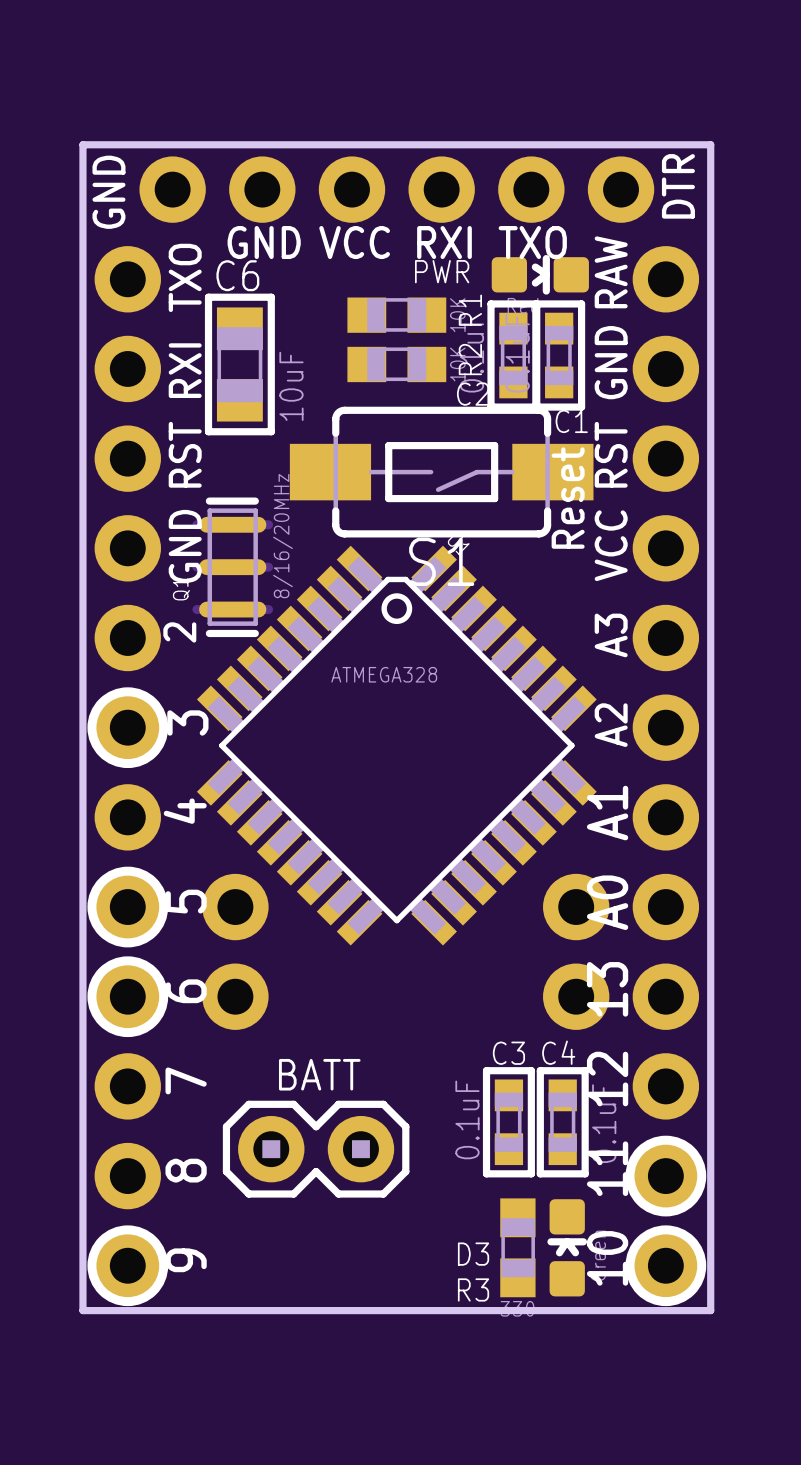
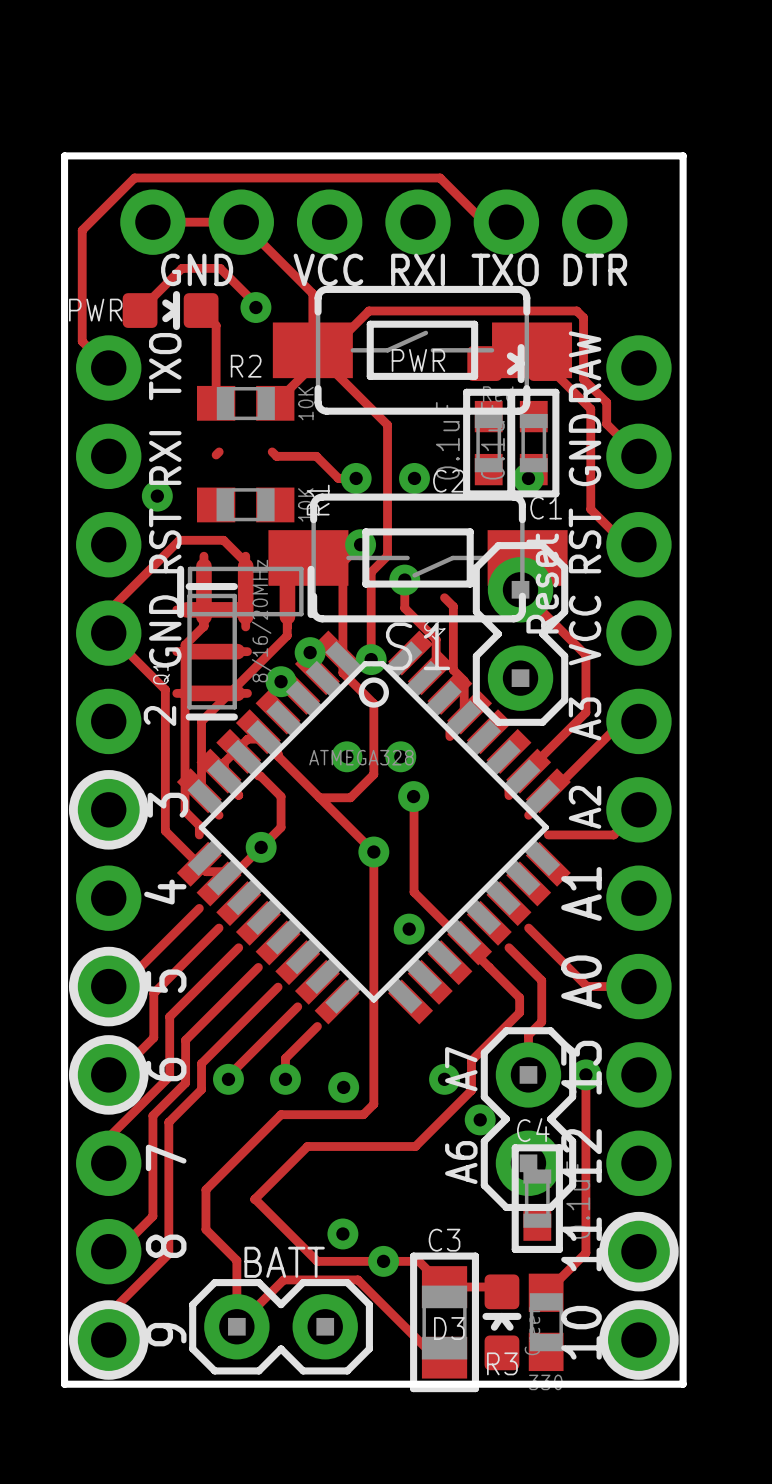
track: none -> (152, 222) (241, 222) (312, 293) (312, 350) (387, 424) (387, 555) (371, 572) (371, 659)
track: none -> (506, 222) (484, 222) (440, 177) (134, 177) (82, 230) (82, 341) (108, 367)
board edge: (82, 144) (710, 144) -> (64, 235) (64, 155) (683, 155) (683, 235)
text: none -> GND (197, 269)
text rotation: 0° (678, 186) -> 90° clockwise (595, 269)
part position: (396, 189) -> (373, 222)
text: GND (108, 192) -> none
track: none -> (255, 307) (255, 304) (220, 268) (182, 268) (140, 310)
via: none -> (255, 307)
PWR: none -> (170, 310)
track: none -> (201, 310) (216, 325) (216, 403)
text: GND (264, 242) -> none
text position: VCC (354, 242) -> VCC (328, 269)
text position: RXI (444, 242) -> RXI (418, 269)
text position: TXO (532, 242) -> TXO (505, 269)
part: none -> (422, 350)
track: none -> (532, 350) (590, 409) (590, 509) (626, 544) (638, 544)
text position: RAW (611, 272) -> RAW (585, 366)
track: none -> (275, 403) (311, 366) (311, 354) (307, 350) (329, 350) (368, 310) (576, 310) (583, 317) (583, 379) (606, 402) (606, 424) (638, 456)
R1 position: (396, 315) -> (245, 504)
R2 name rotation: 0° (470, 359) -> 90° clockwise (246, 366)
R2 name position: R2 (470, 359) -> R2 (246, 366)
track: none -> (219, 451) (216, 454)
C6: 10uF (239, 364) -> none
track: none -> (272, 451) (276, 456) (316, 456) (338, 478) (356, 478)
R2 position: (396, 364) -> (245, 403)
via: none -> (356, 478)
via: none -> (414, 478)
via: none -> (528, 478)
via: none -> (157, 496)
track: none -> (360, 544) (342, 562) (342, 672) (373, 703) (373, 774) (350, 797) (319, 797)
via: none -> (360, 544)
track: none -> (404, 580) (404, 608) (436, 639) (436, 661)
via: none -> (404, 580)
track: none -> (520, 589) (585, 655) (585, 712) (508, 789) (508, 795)
track: none -> (203, 591) (203, 626) (185, 645) (185, 811) (199, 825) (199, 834)
track: none -> (245, 591) (245, 562) (223, 540) (179, 540) (108, 610) (108, 633) (165, 689) (165, 830) (206, 871) (236, 871) (281, 827) (281, 796) (258, 775)
part: none -> (245, 591)
track: none -> (287, 591) (287, 635) (201, 721) (201, 797) (219, 815)
track: none -> (444, 597) (453, 606) (453, 670) (464, 680) (464, 712) (449, 727) (449, 736)
via: none -> (310, 652)
via: none -> (371, 659)
via: none -> (281, 681)
track: none -> (638, 721) (622, 721) (528, 815)
via: none -> (346, 756)
via: none -> (400, 756)
track: none -> (238, 795) (224, 780) (224, 762) (247, 739) (263, 739) (373, 851) (373, 1104) (363, 1114) (281, 1114) (205, 1189) (205, 1229) (236, 1260) (236, 1326) (283, 1279) (357, 1279) (435, 1357) (444, 1357)
track: none -> (414, 797) (414, 892) (519, 997) (519, 1012) (471, 1060) (471, 1090) (415, 1146) (307, 1146) (254, 1199)
via: none -> (413, 796)
track: none -> (638, 809) (613, 834) (548, 834)
via: none -> (261, 847)
via: none -> (373, 851)
track: none -> (199, 908) (121, 986) (108, 986)
track: none -> (219, 928) (153, 993) (153, 1037) (116, 1074) (108, 1074)
track: none -> (528, 928) (587, 986) (638, 986)
via: none -> (409, 929)
track: none -> (238, 947) (169, 1016) (169, 1076) (108, 1137) (108, 1163)
track: none -> (508, 947) (541, 980) (541, 1021) (528, 1035) (528, 1074)
track: none -> (258, 967) (185, 1040) (185, 1083) (152, 1115) (152, 1216) (117, 1251) (108, 1251)
track: none -> (278, 987) (201, 1063) (201, 1089) (168, 1122) (168, 1254) (108, 1314) (108, 1340)
track: none -> (297, 1006) (228, 1076) (228, 1079)
track: none -> (317, 1026) (285, 1058) (285, 1079)
part side: bottom (235, 951) -> top (520, 633)
part side: bottom (576, 951) -> top (528, 1119)
text: none -> A7 (461, 1069)
track: none -> (585, 1074) (585, 1253) (546, 1292)
via: none -> (585, 1074)
via: none -> (228, 1079)
via: none -> (285, 1079)
via: none -> (444, 1079)
via: none -> (343, 1087)
via: none -> (480, 1119)
C3 footprint: [482, 1067, 535, 1178] -> [410, 1252, 479, 1393]
BATT name position: BATT (319, 1074) -> BATT (284, 1262)
text: none -> A6 (461, 1162)
C3 value: 0.1uF (467, 1119) -> none
track: none -> (254, 1199) (317, 1261) (418, 1261) (444, 1287) (497, 1287) (501, 1291)
BATT position: (316, 1149) -> (281, 1326)
via: none -> (342, 1233)
via: none -> (383, 1261)
R3 position: (517, 1247) -> (546, 1322)
D3 position: (567, 1247) -> (501, 1322)

